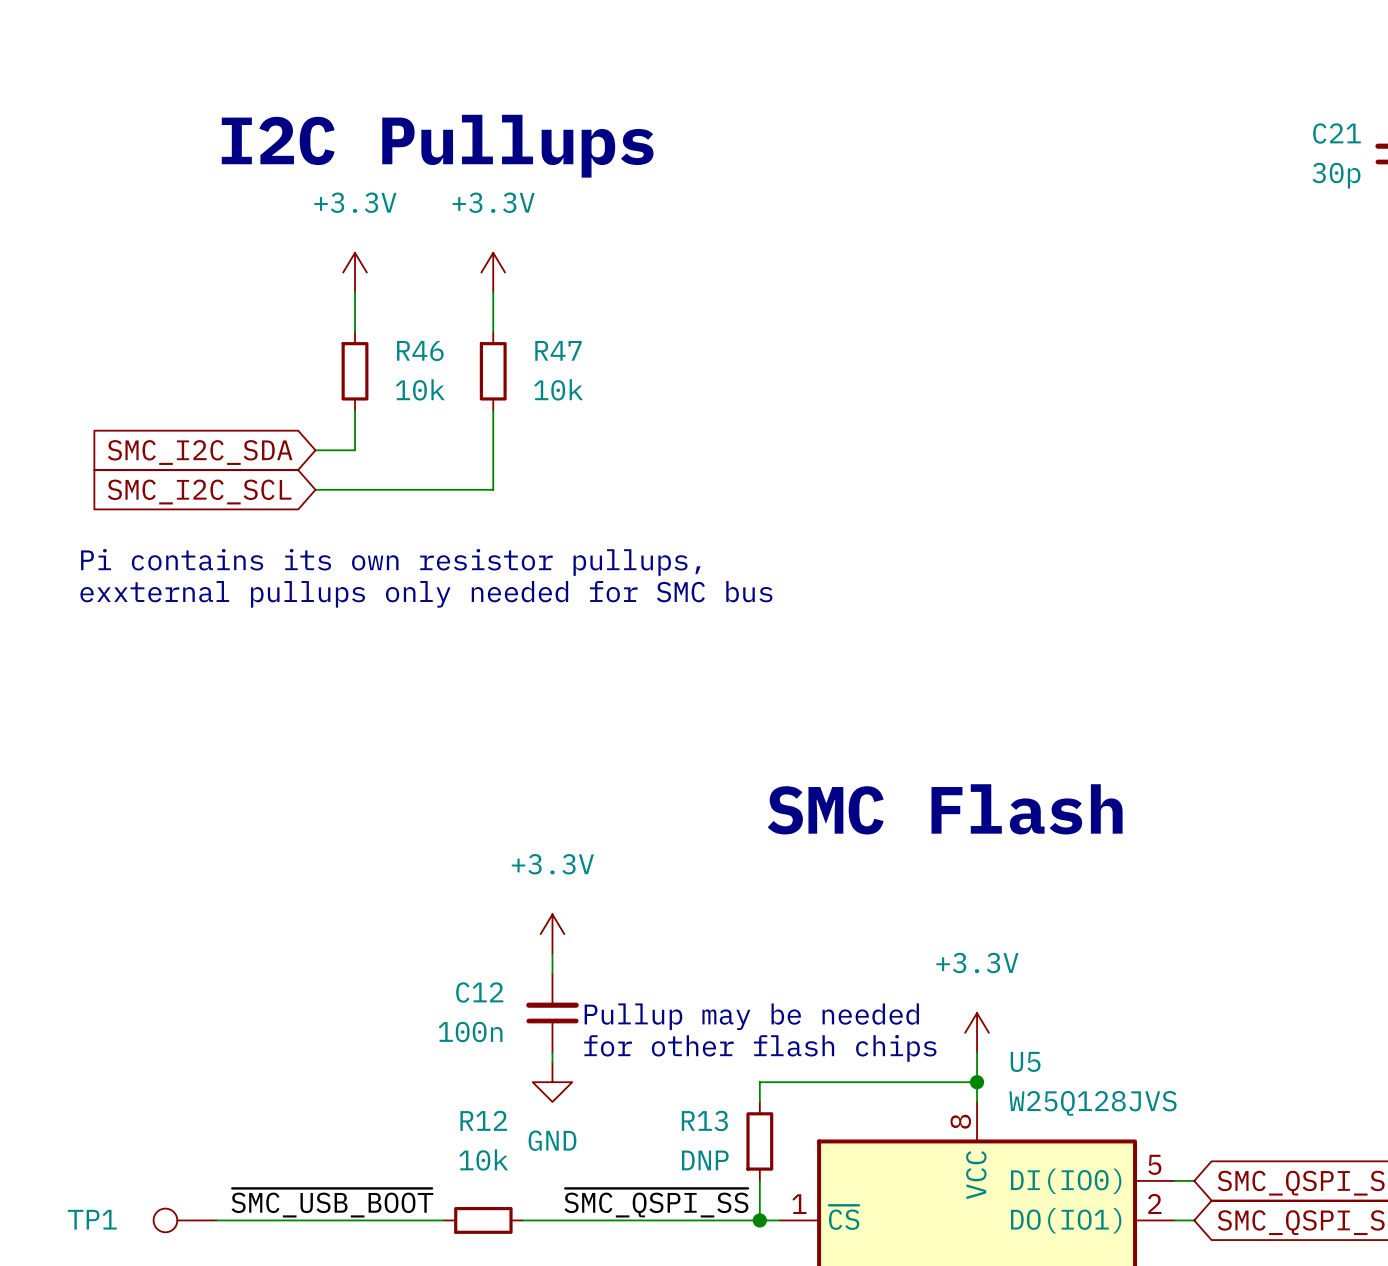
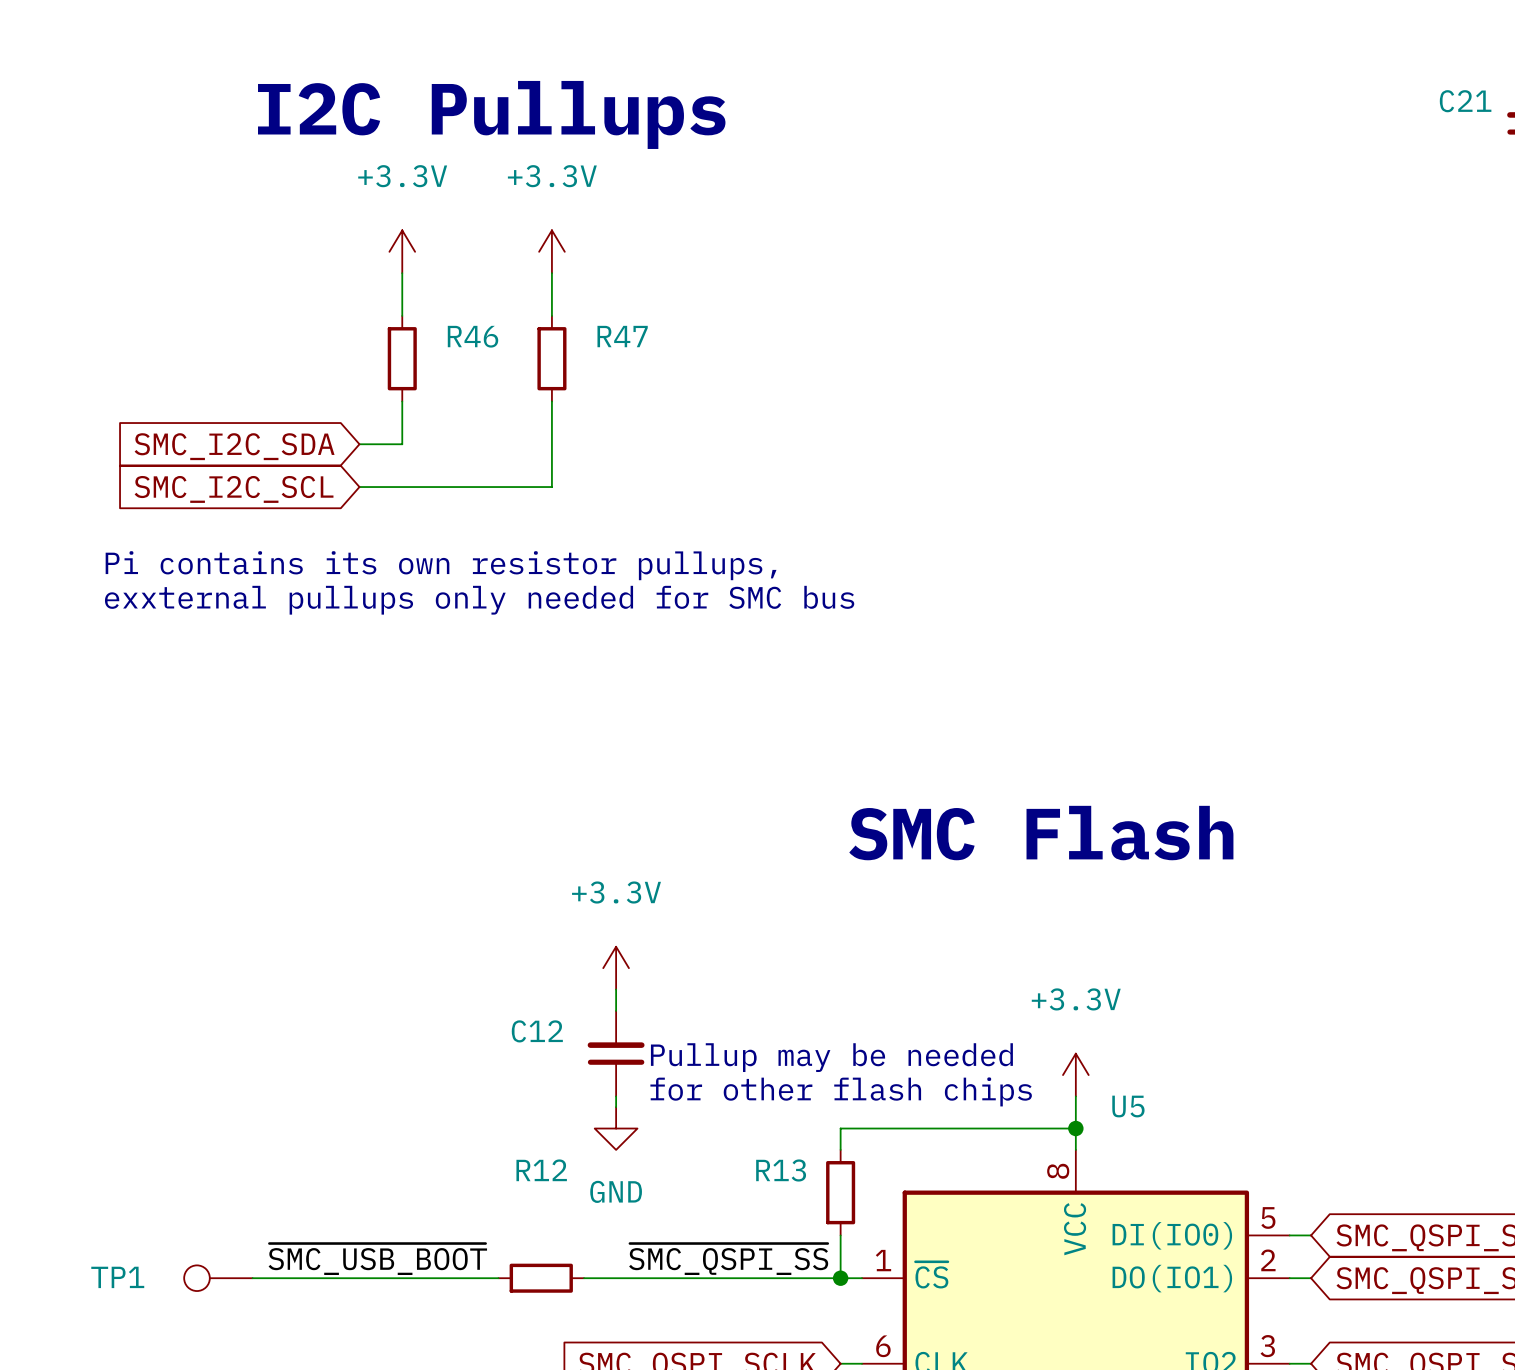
C21 value: 30p (1336, 175) -> none
R46 value: 10k (420, 389) -> none
R47 value: 10k (558, 389) -> none
C12 value: 100n (470, 1032) -> none
U5 value: W25Q128JVS (1093, 1103) -> none
R12 value: 10k (483, 1160) -> none
R13 value: DNP (705, 1160) -> none

